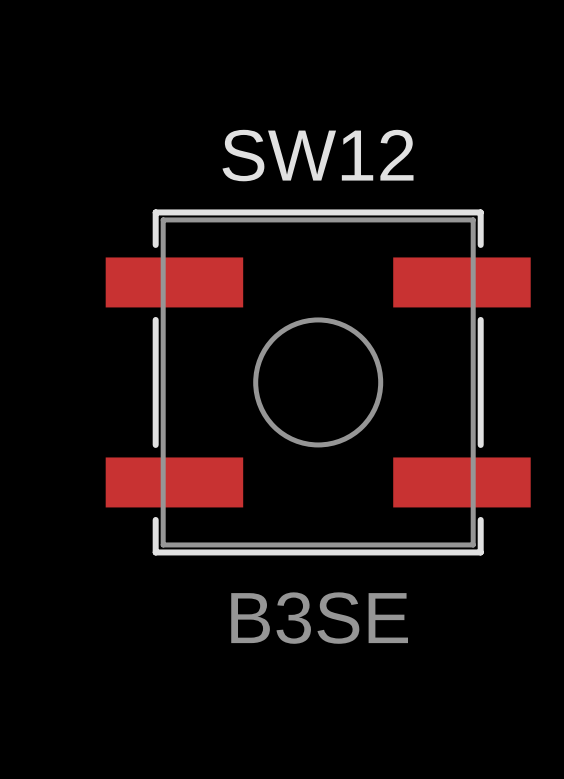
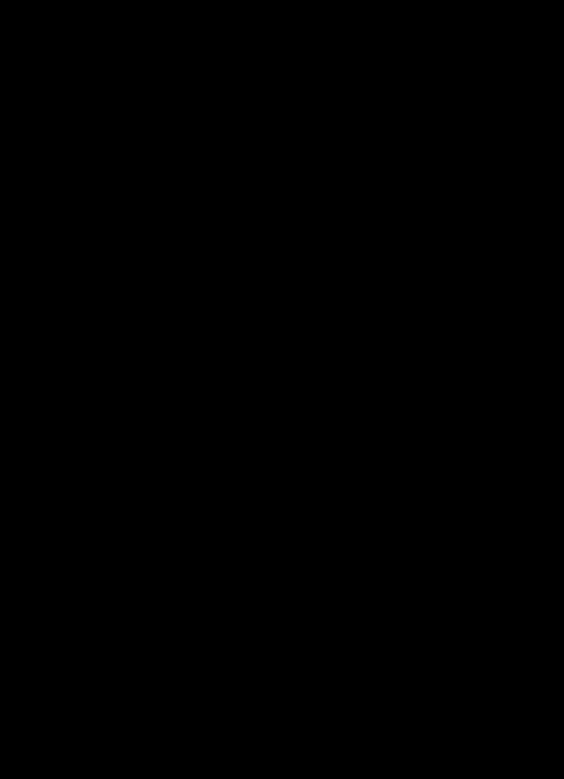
SW12: B3SE (318, 382) -> none

